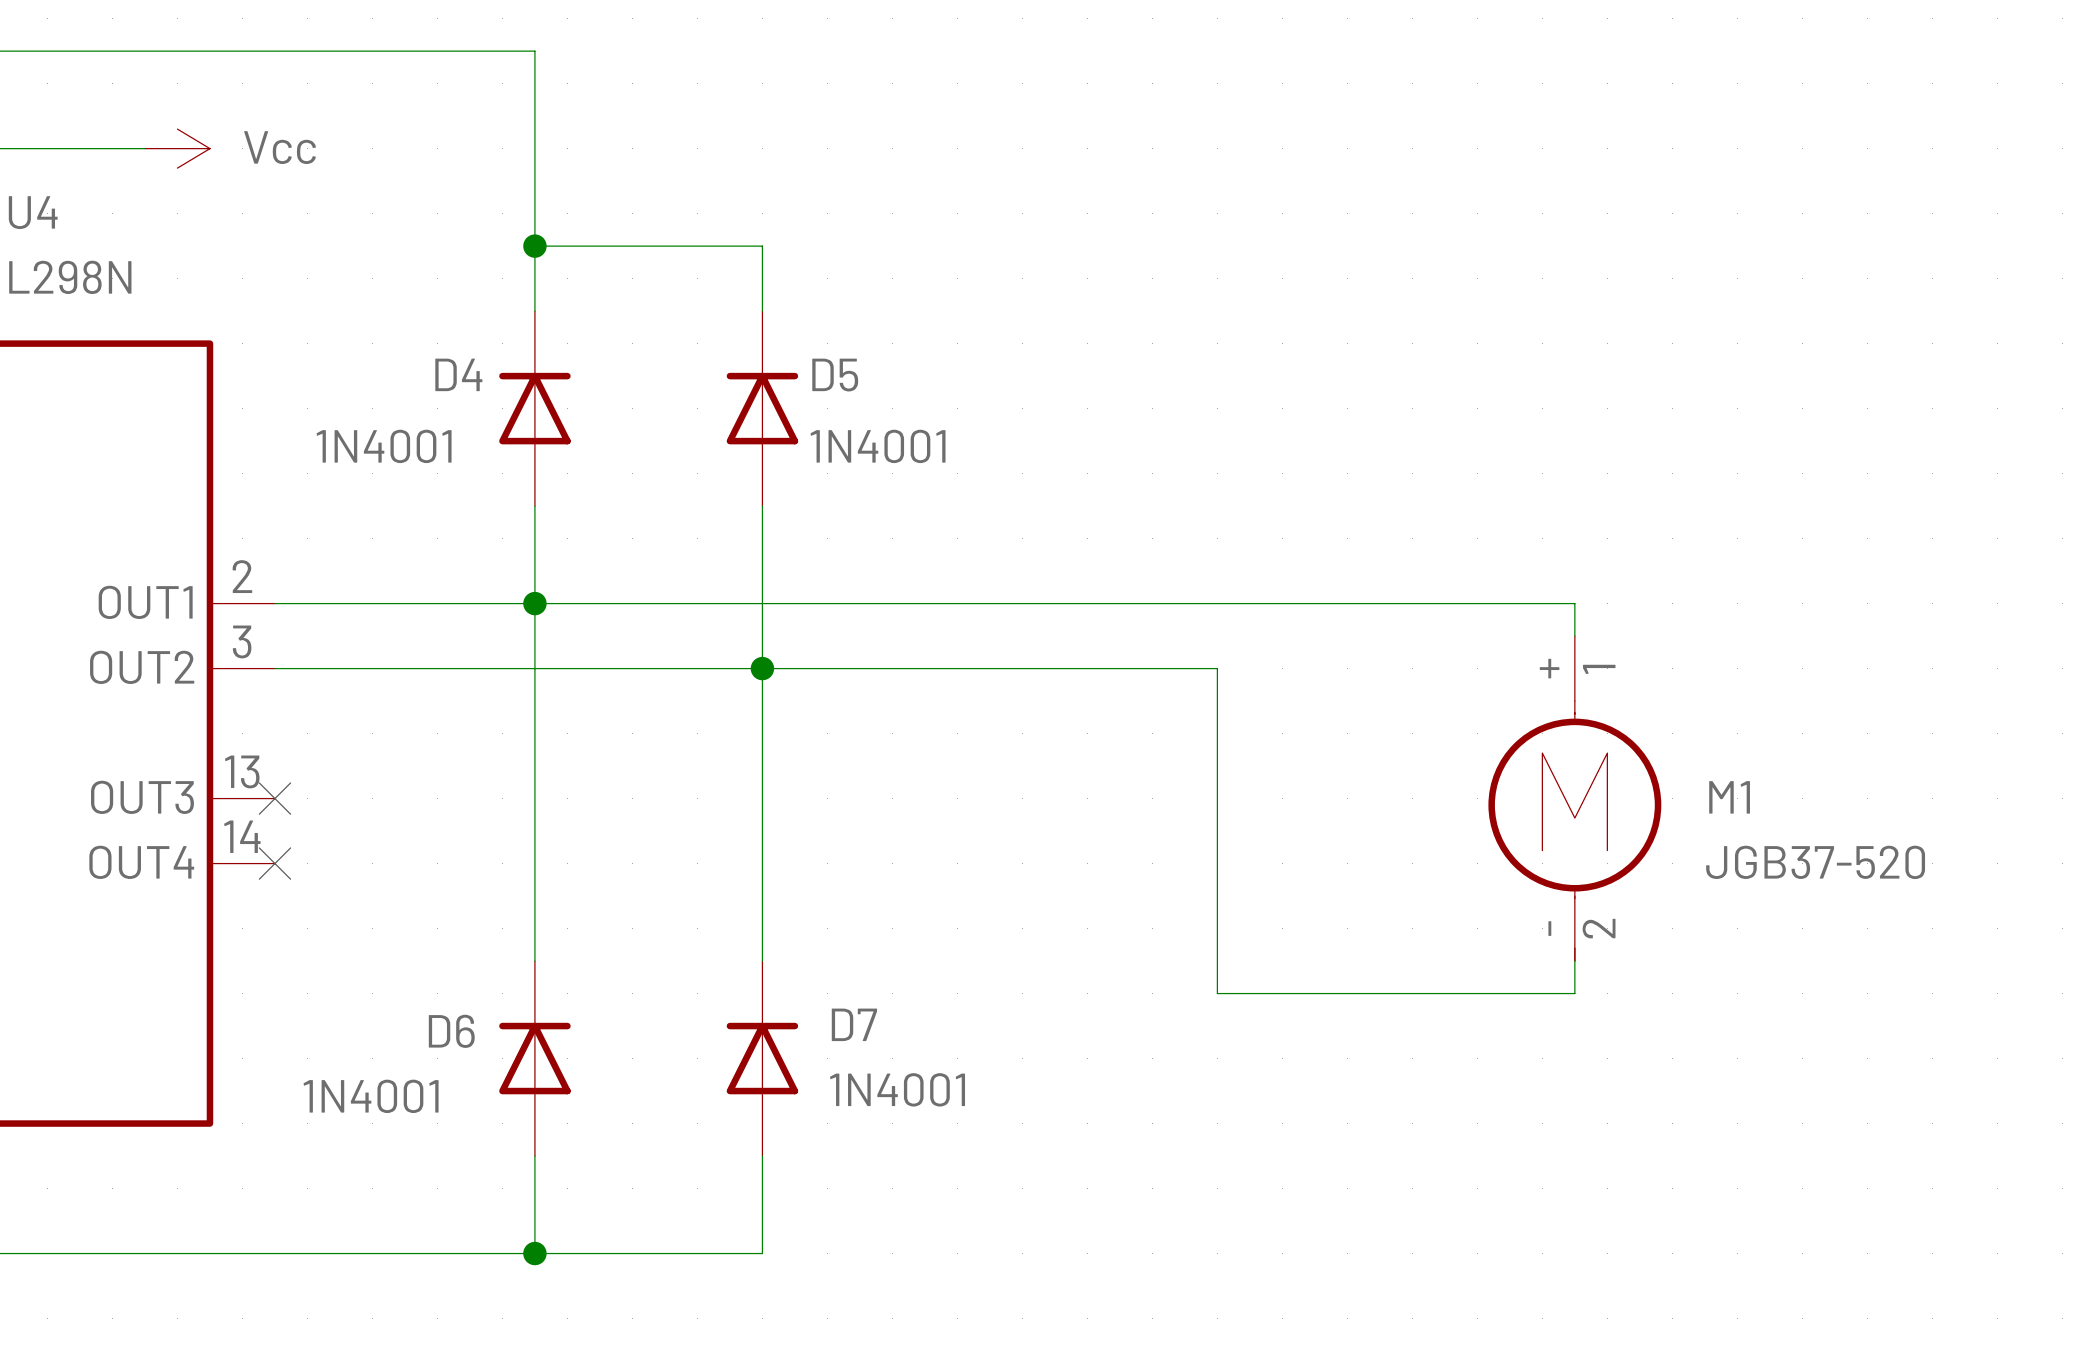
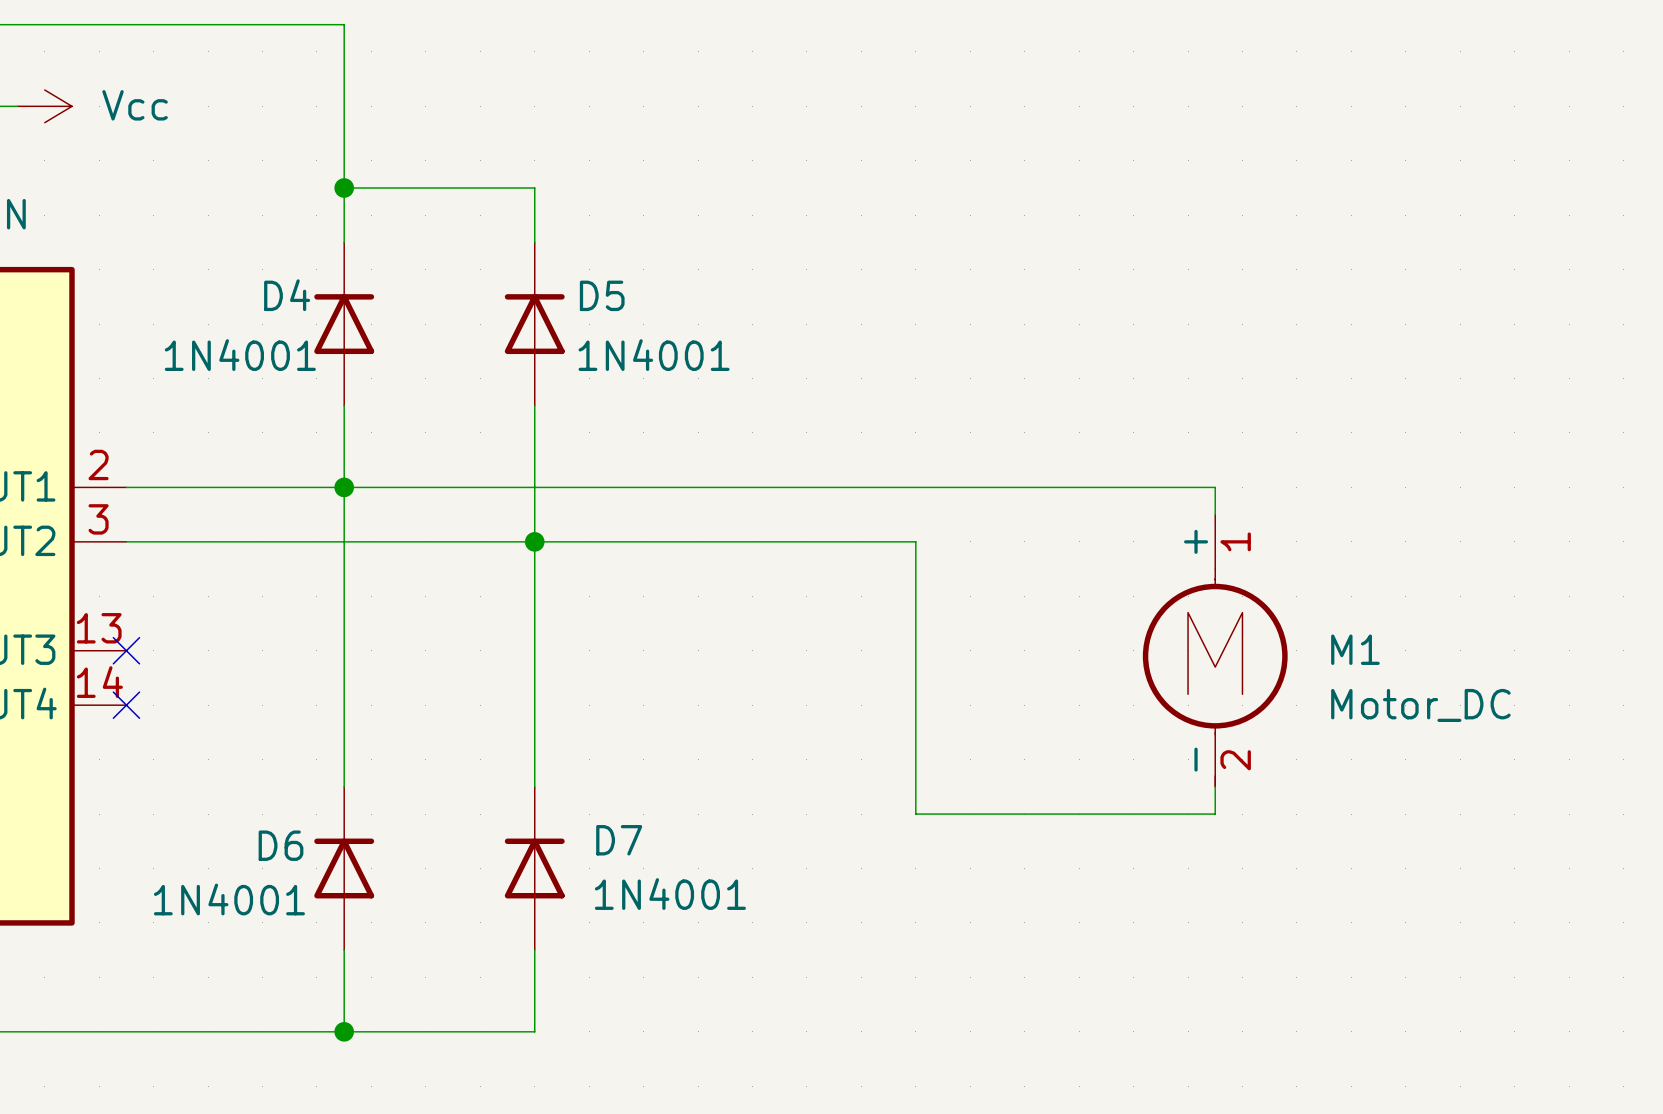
M1 value: JGB37-520 (1815, 862) -> Motor_DC (1420, 705)

